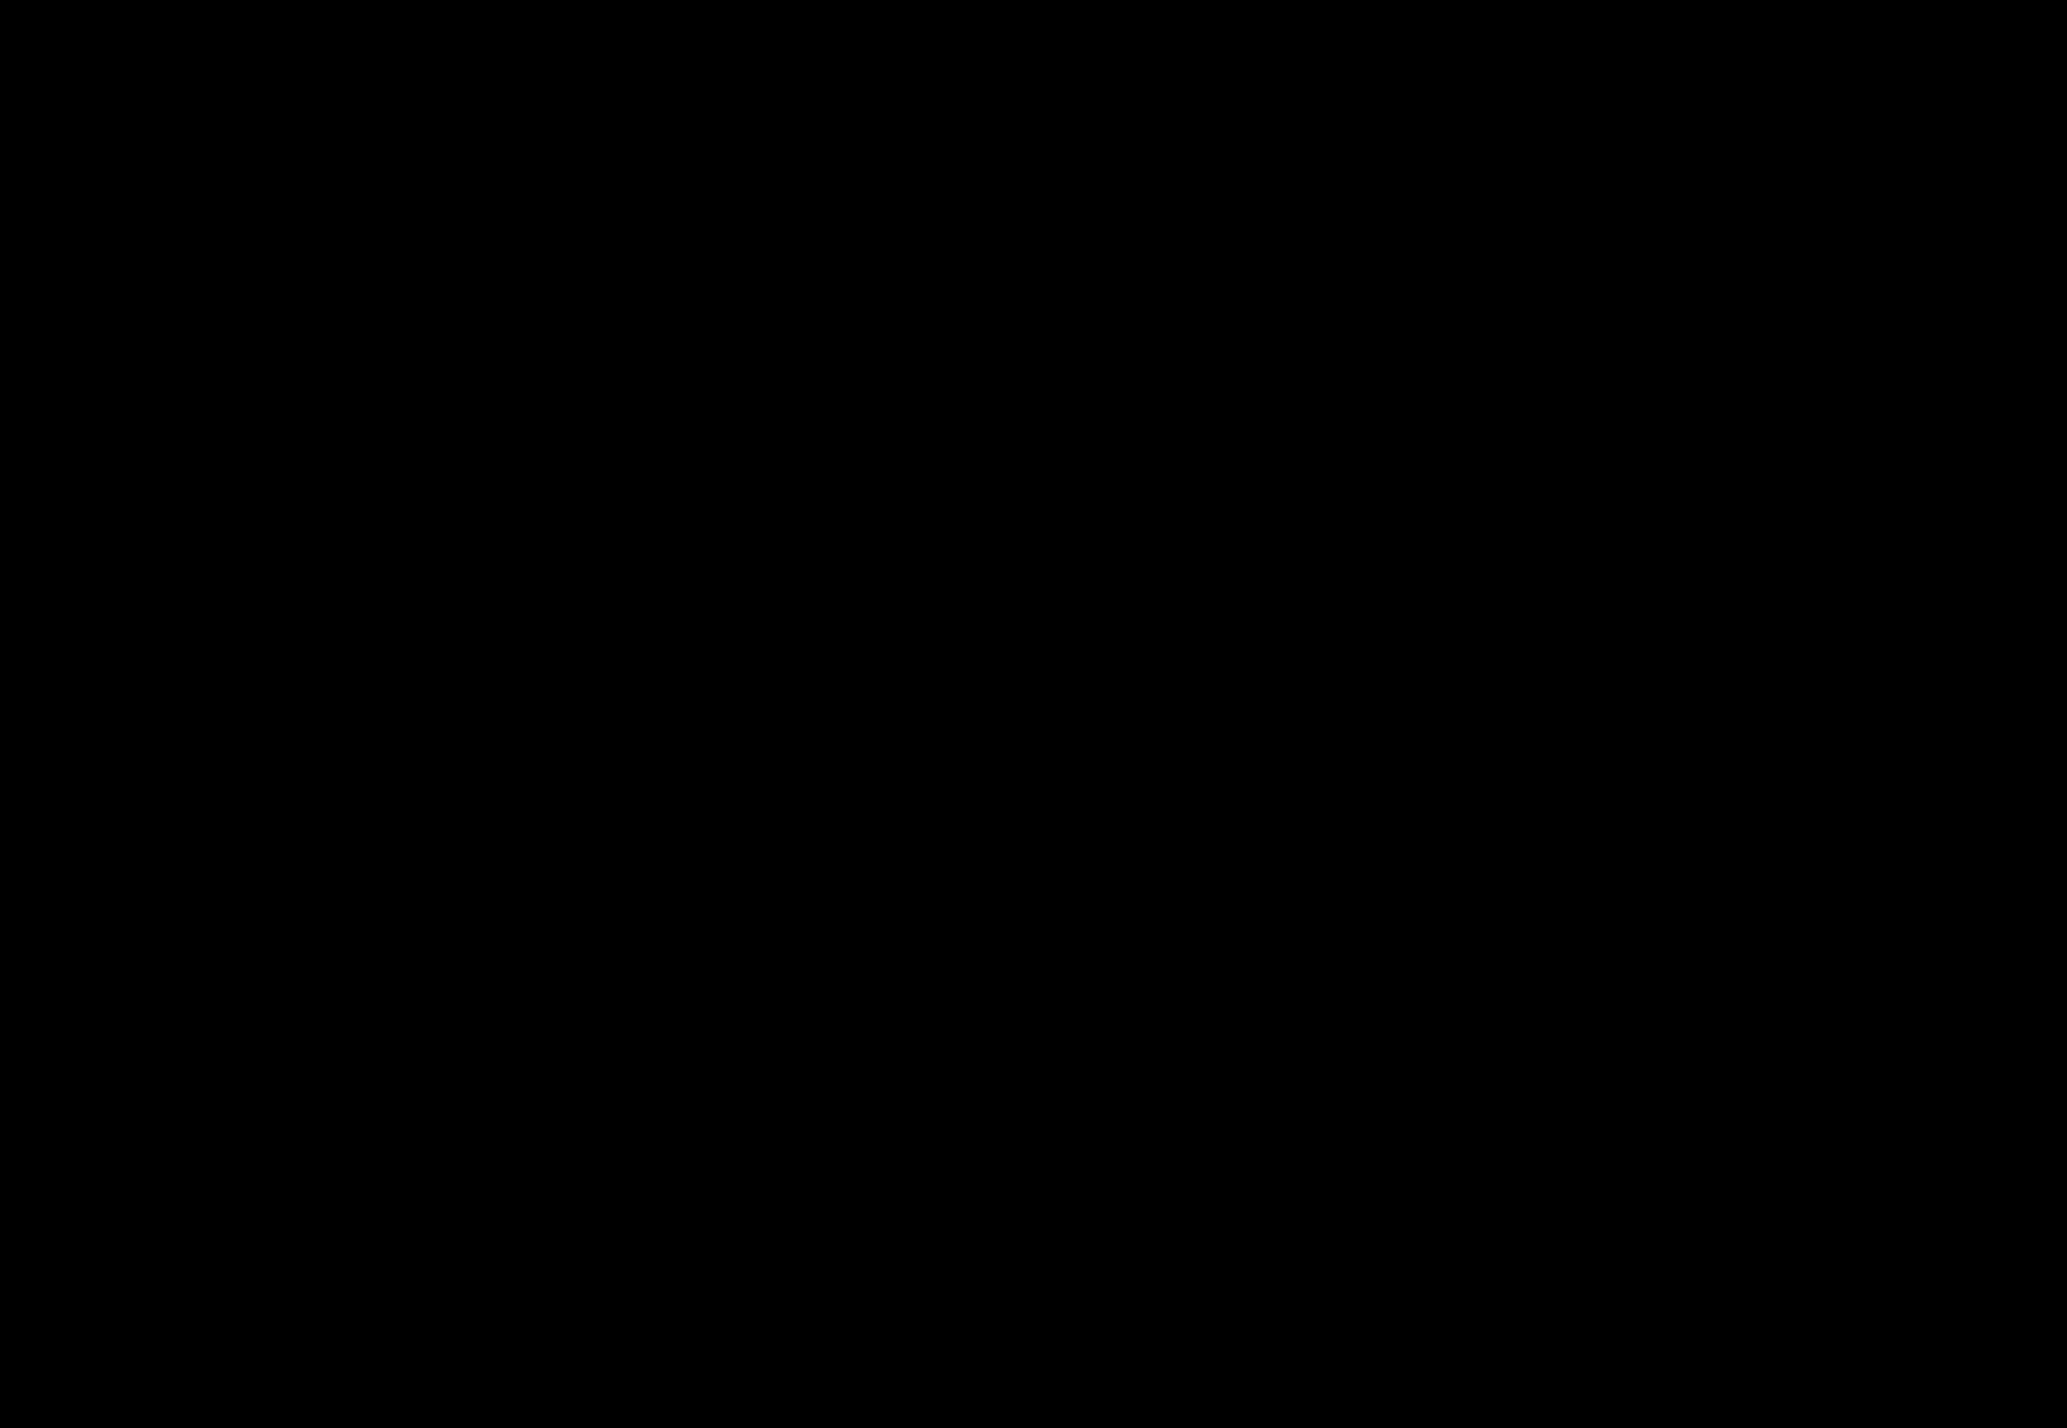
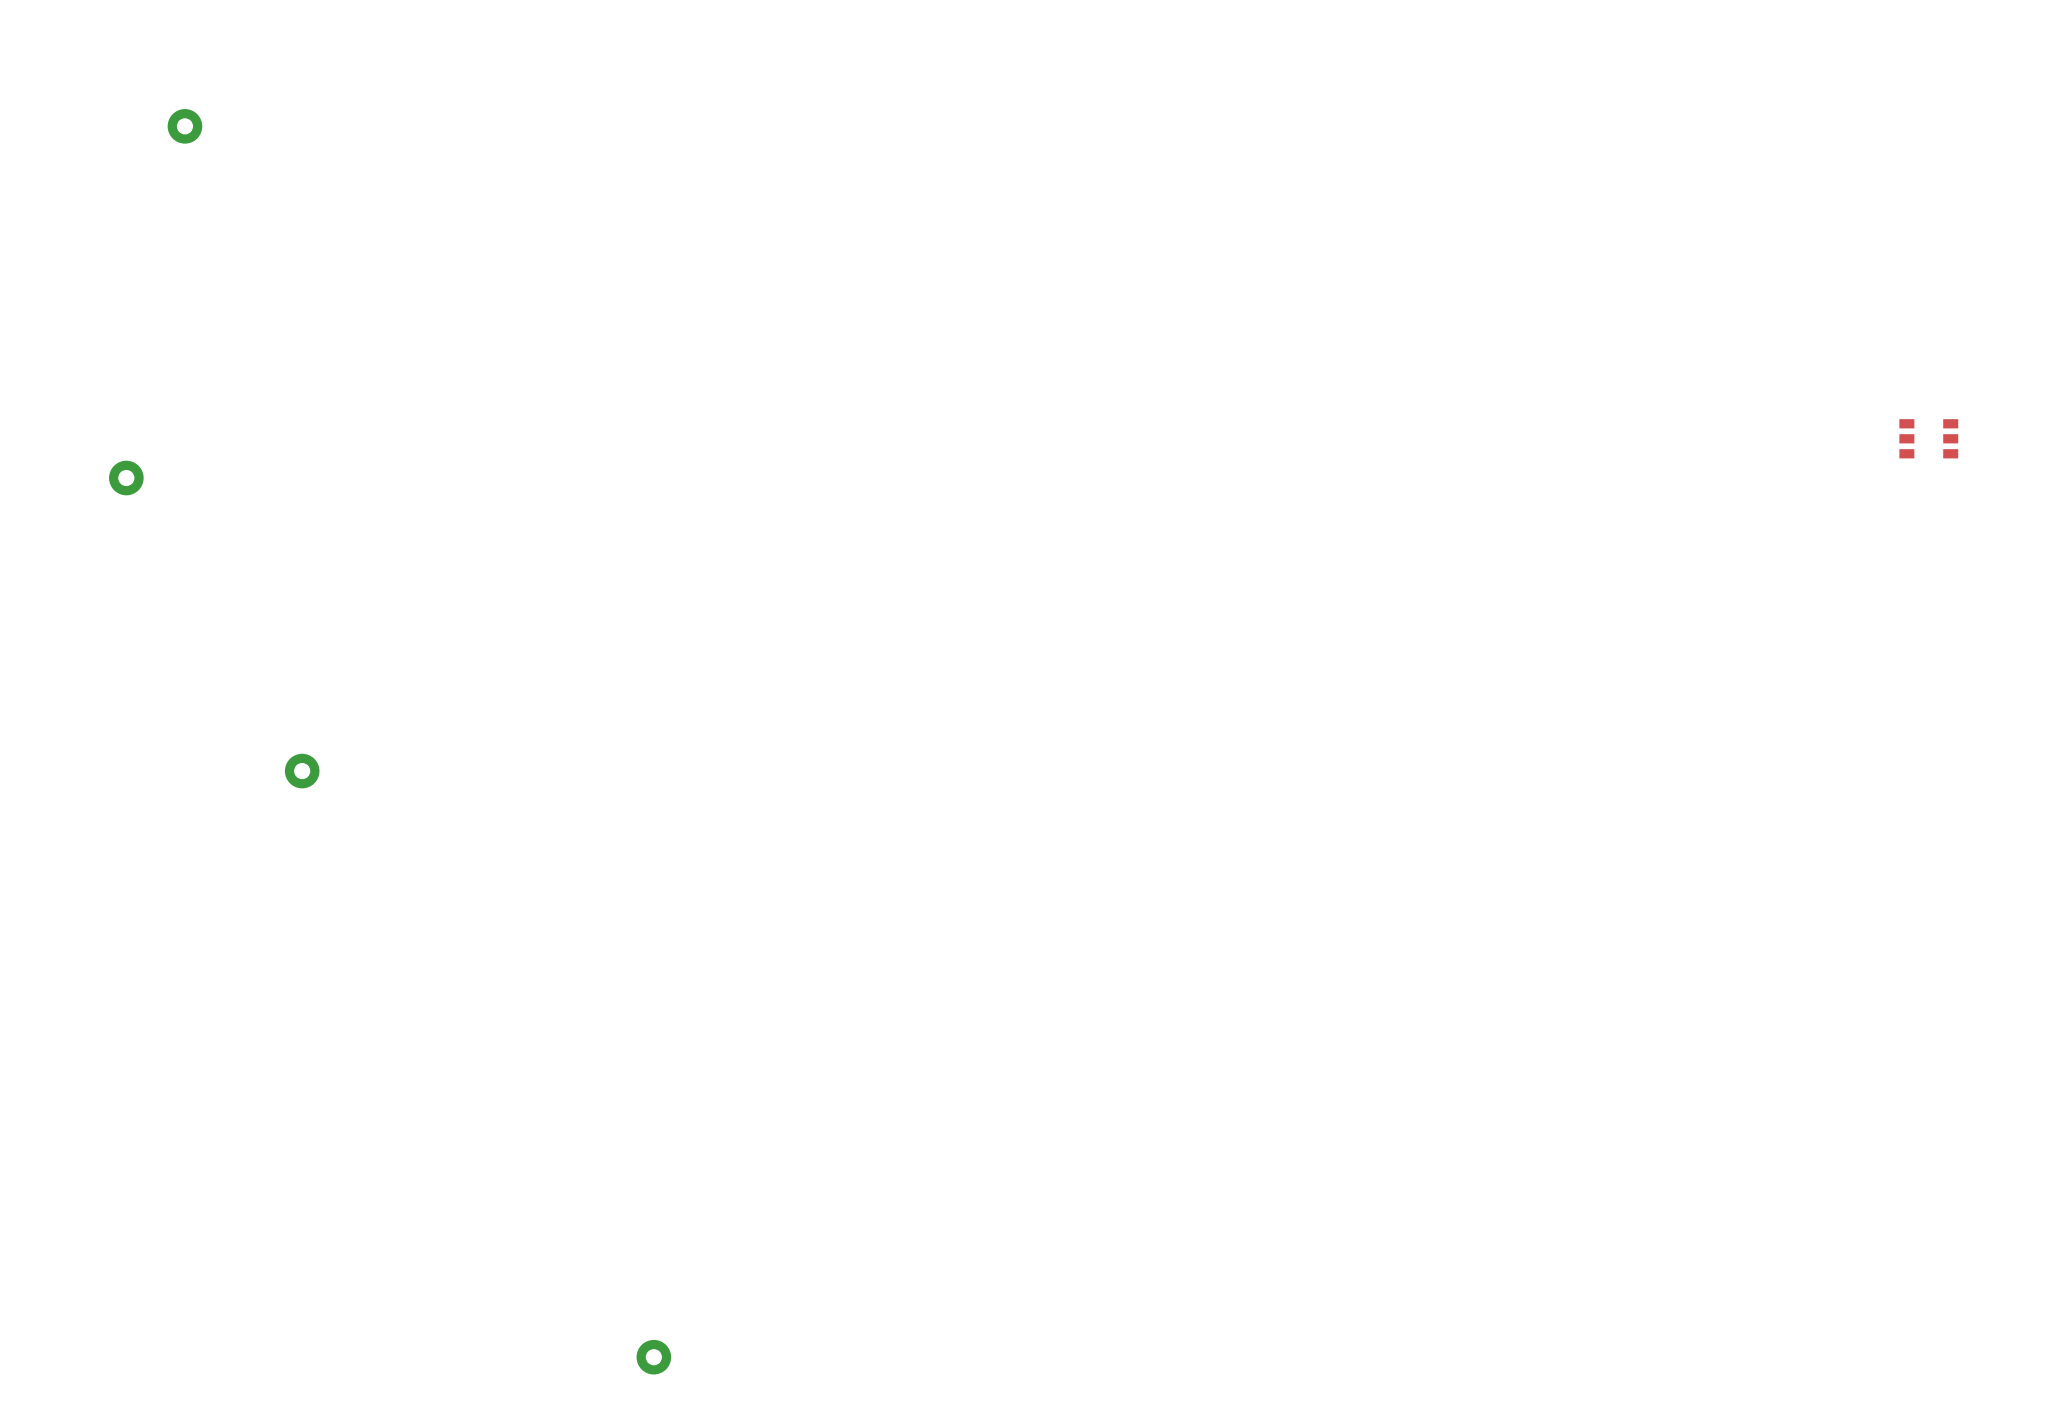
part: none -> (184, 126)
part: none -> (1928, 438)
part: none -> (126, 478)
part: none -> (302, 771)
part: none -> (653, 1357)

